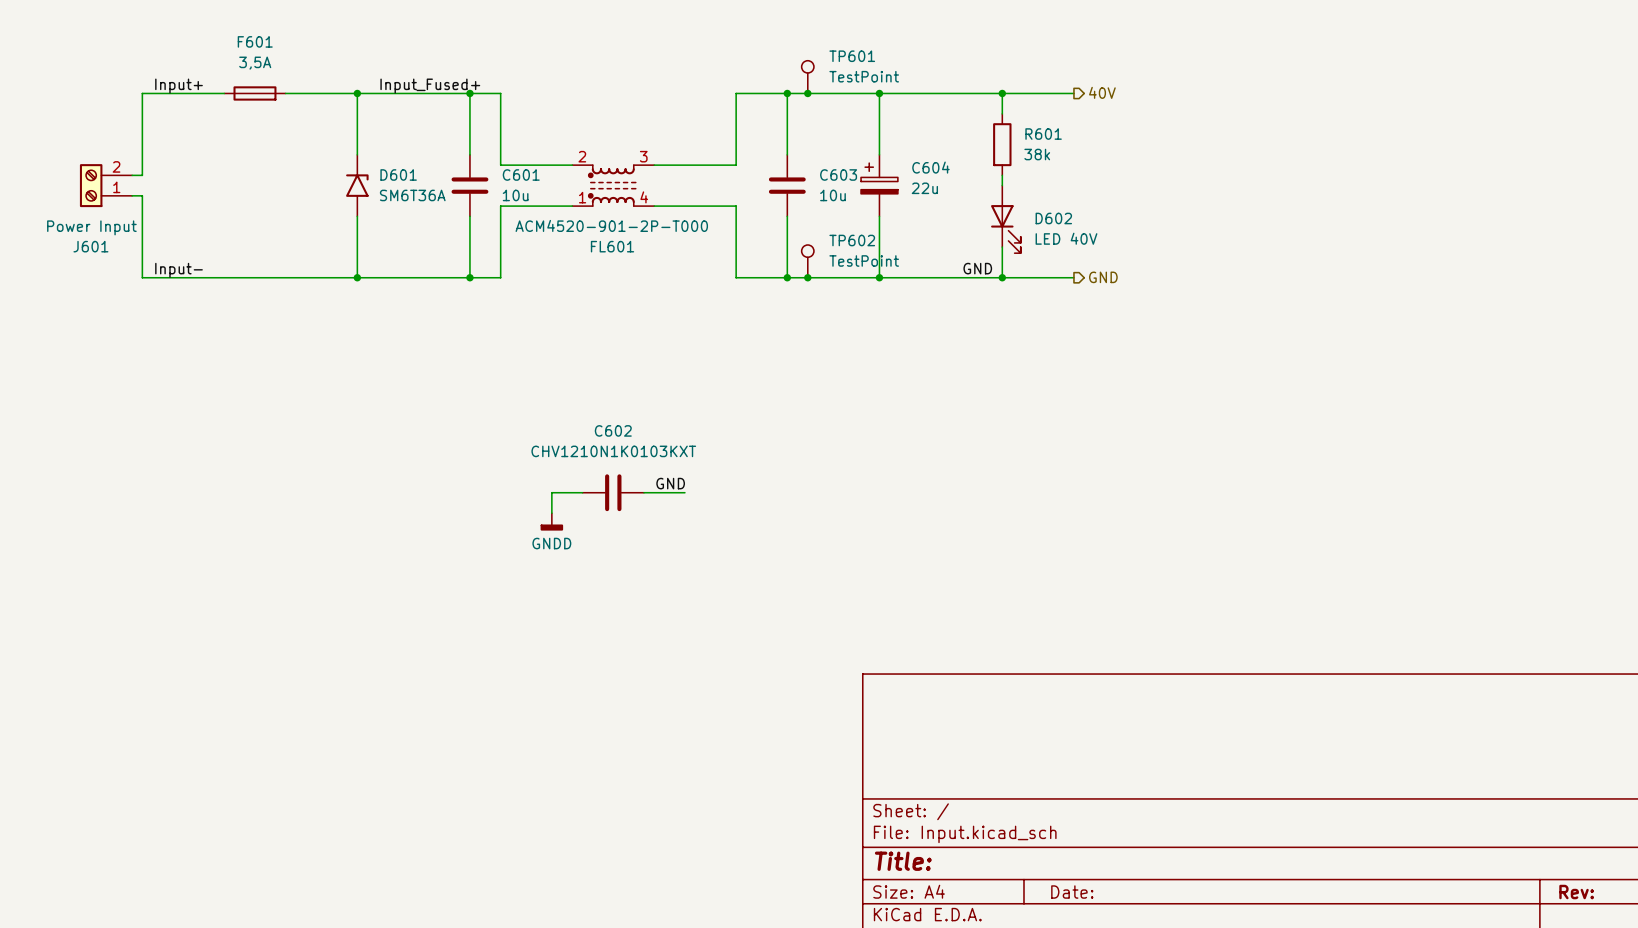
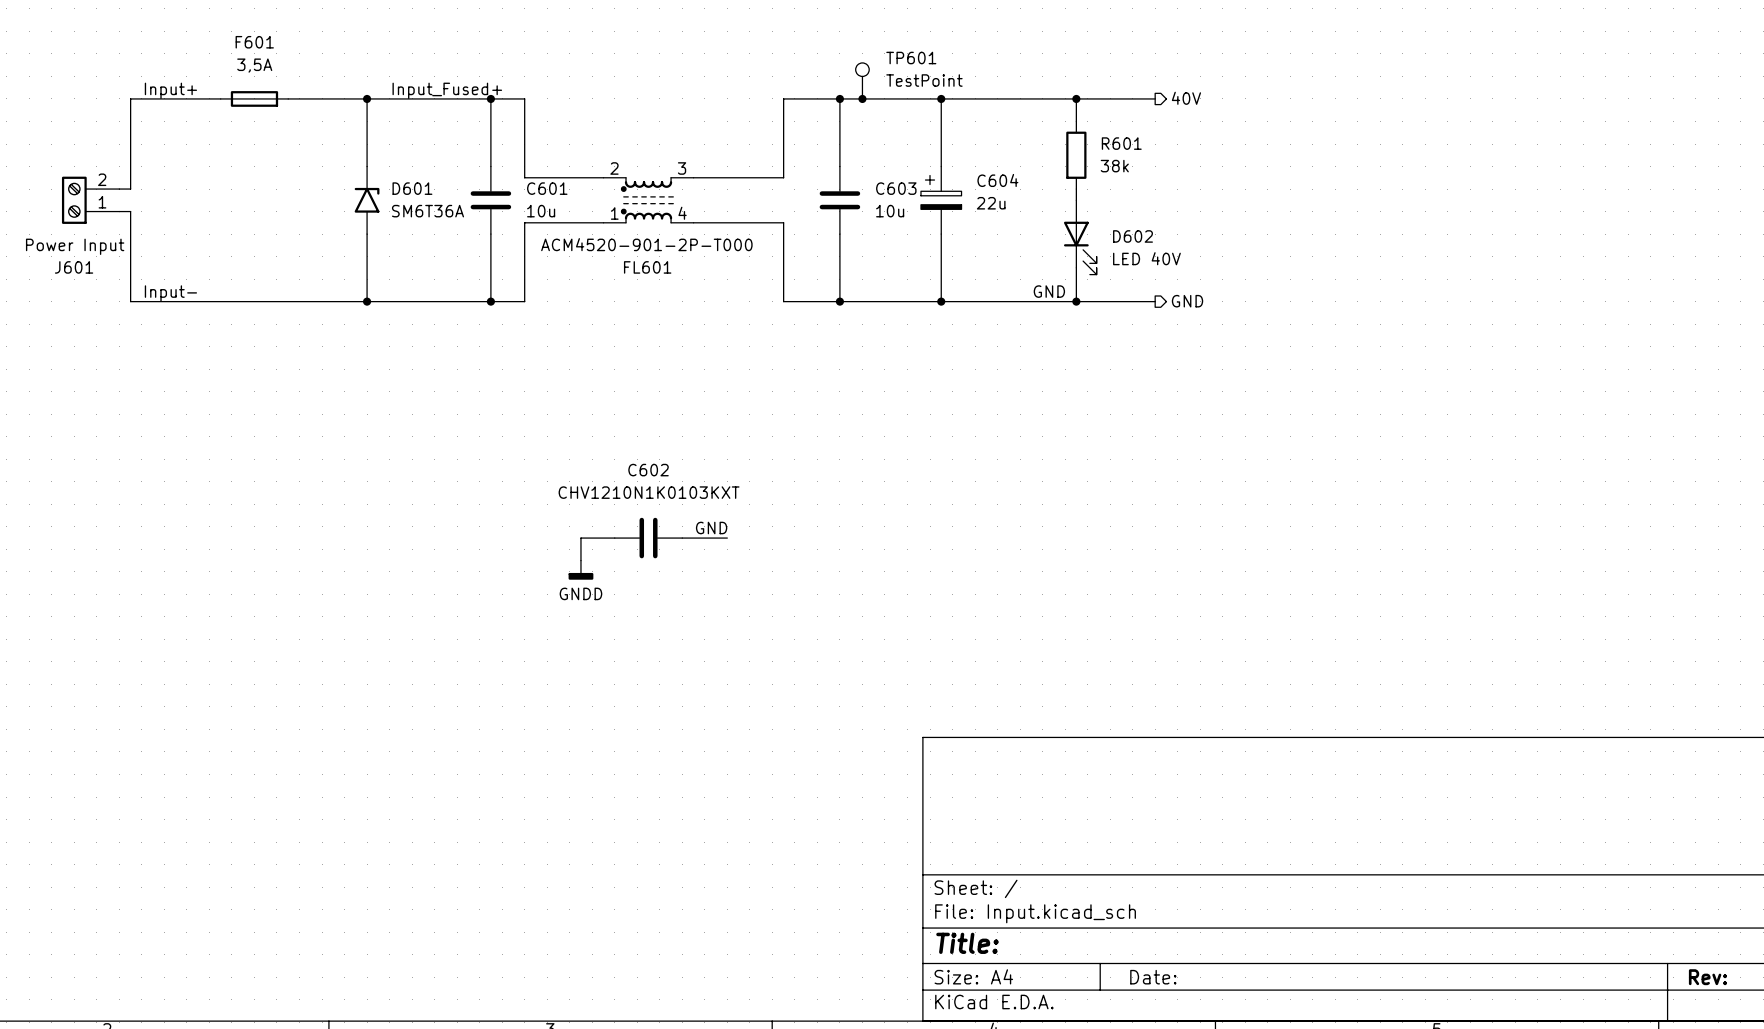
TP602: TestPoint (807, 261) -> none
junction: (807, 277) -> none

